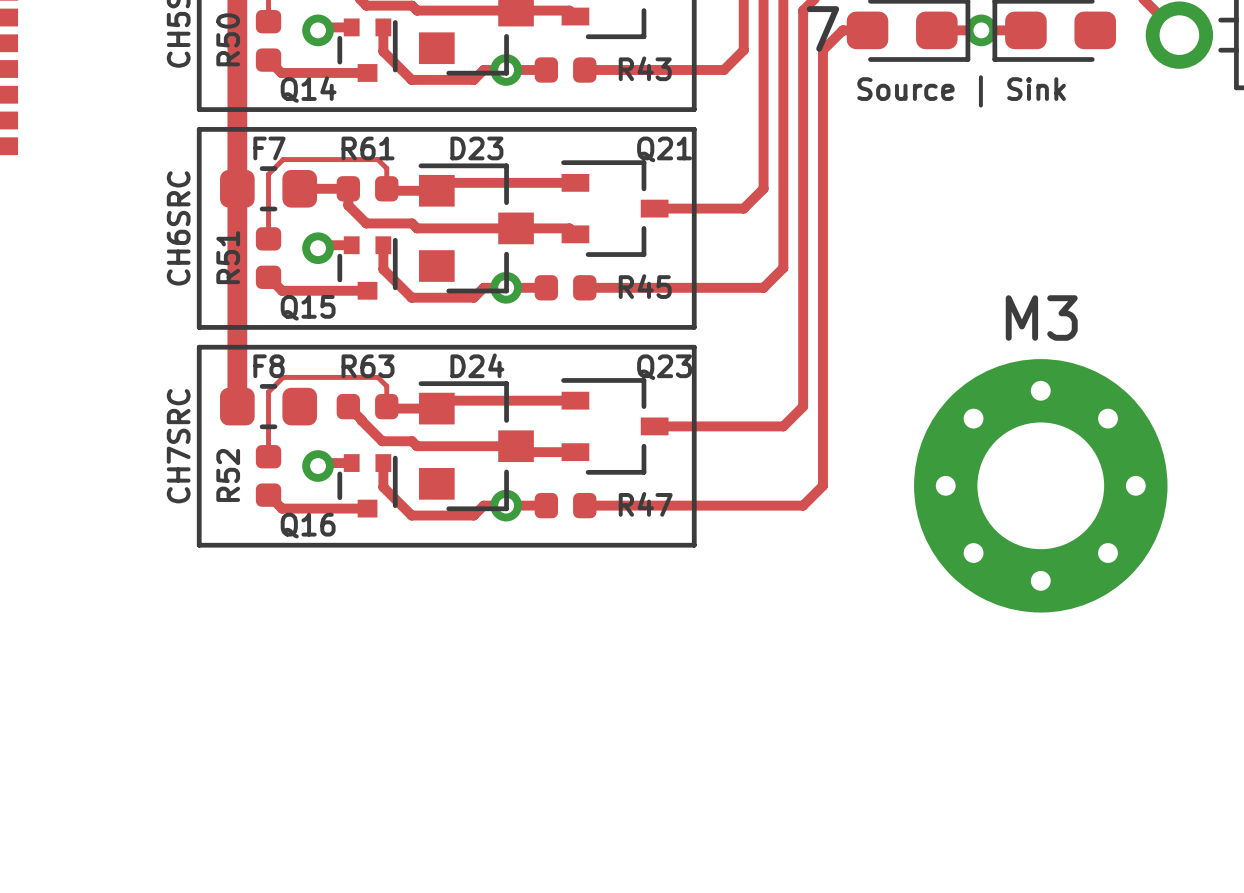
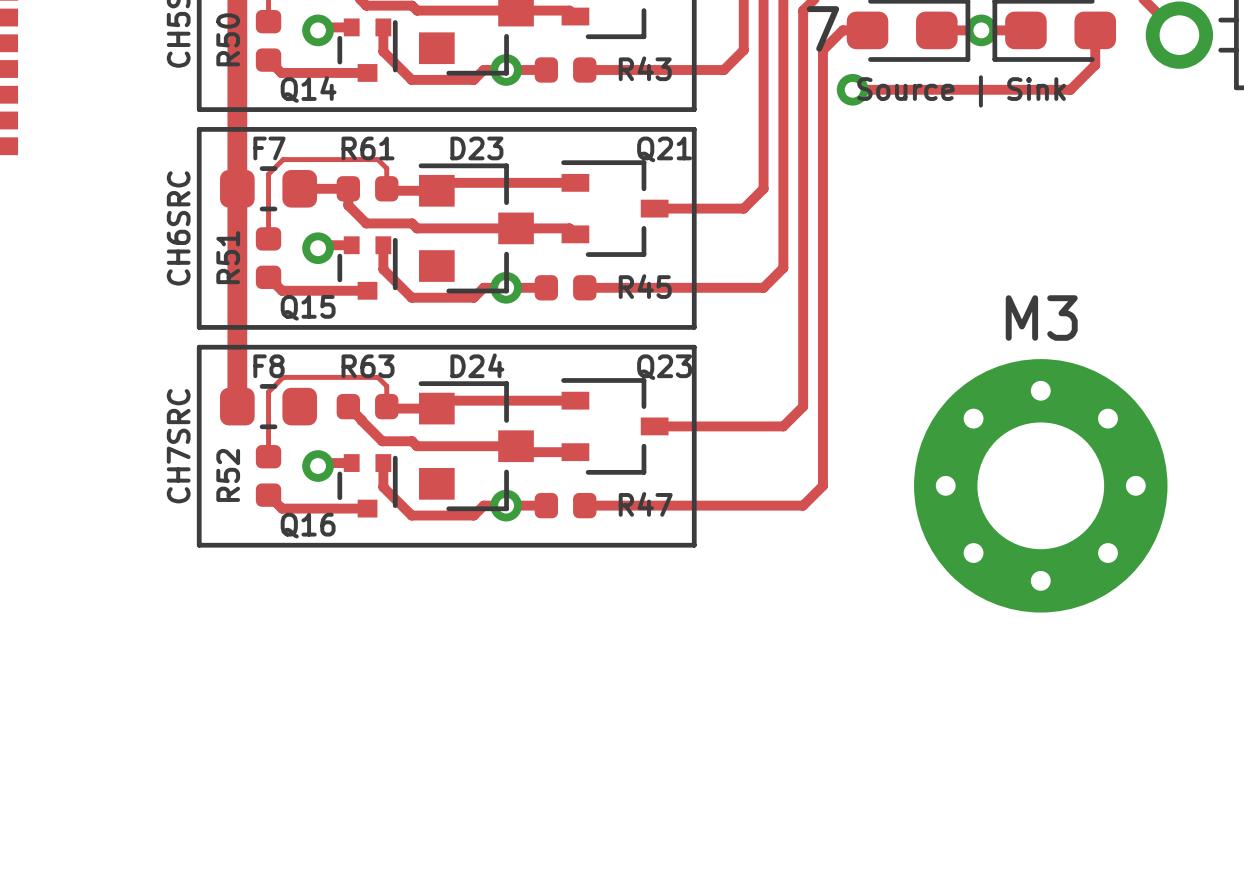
track: none -> (1095, 30) (1095, 65) (1070, 89) (852, 89)
via: none -> (852, 89)

